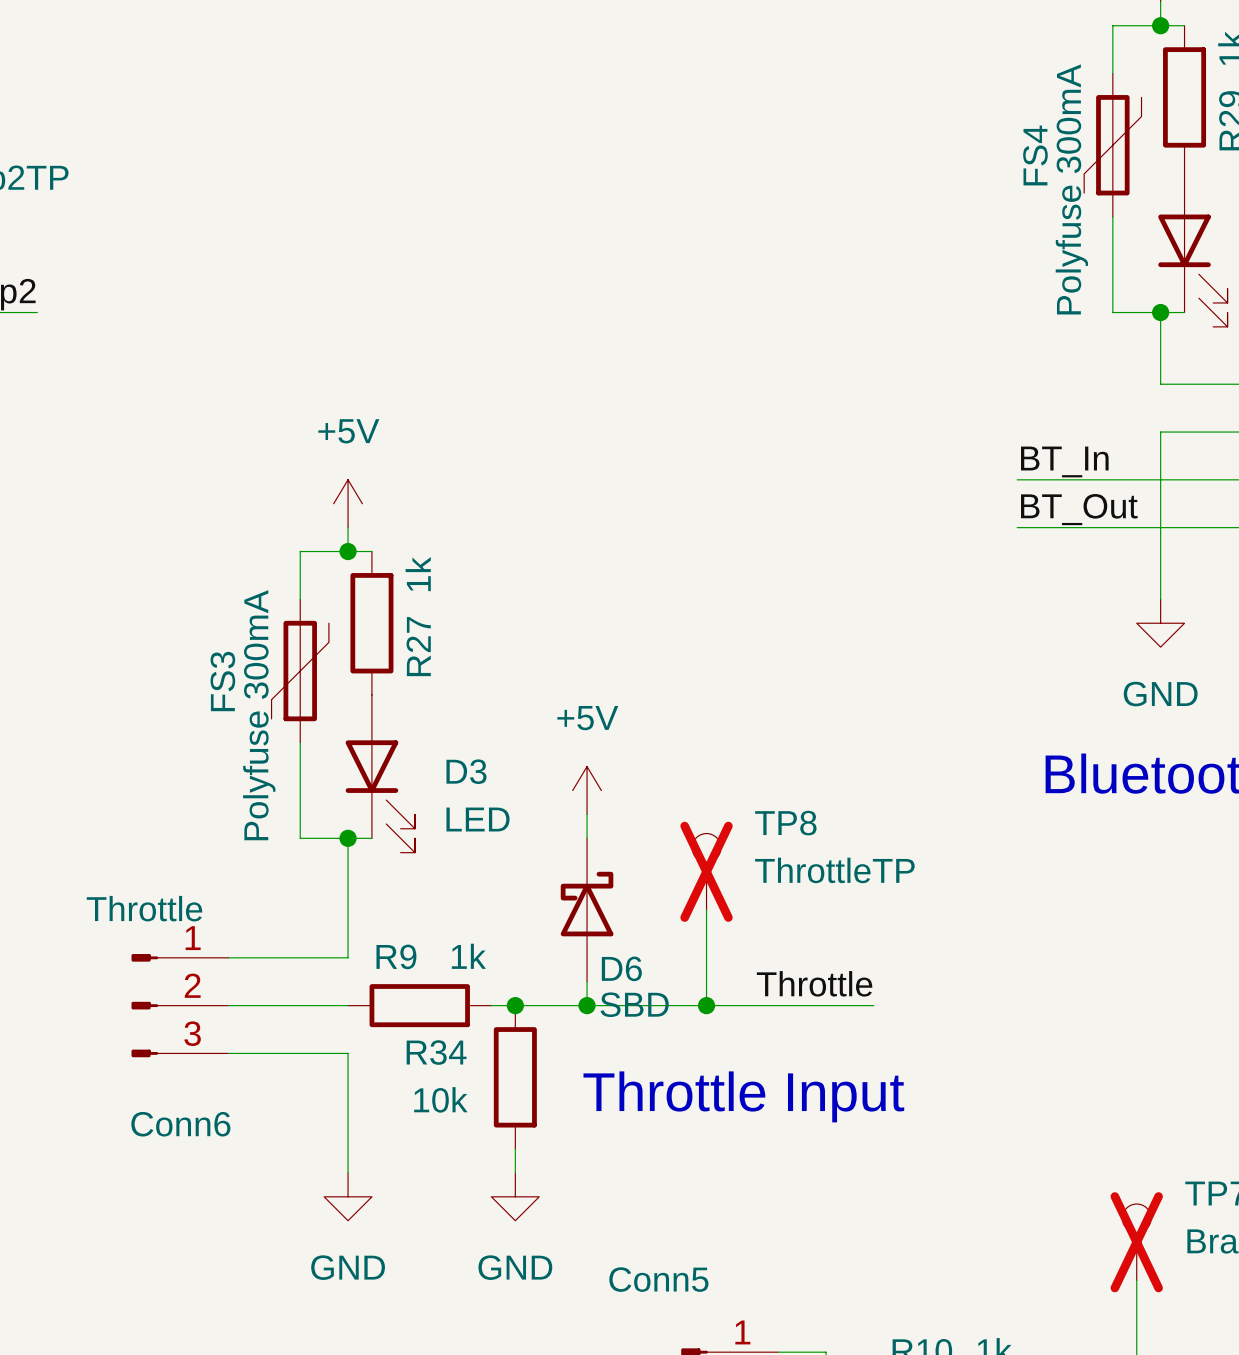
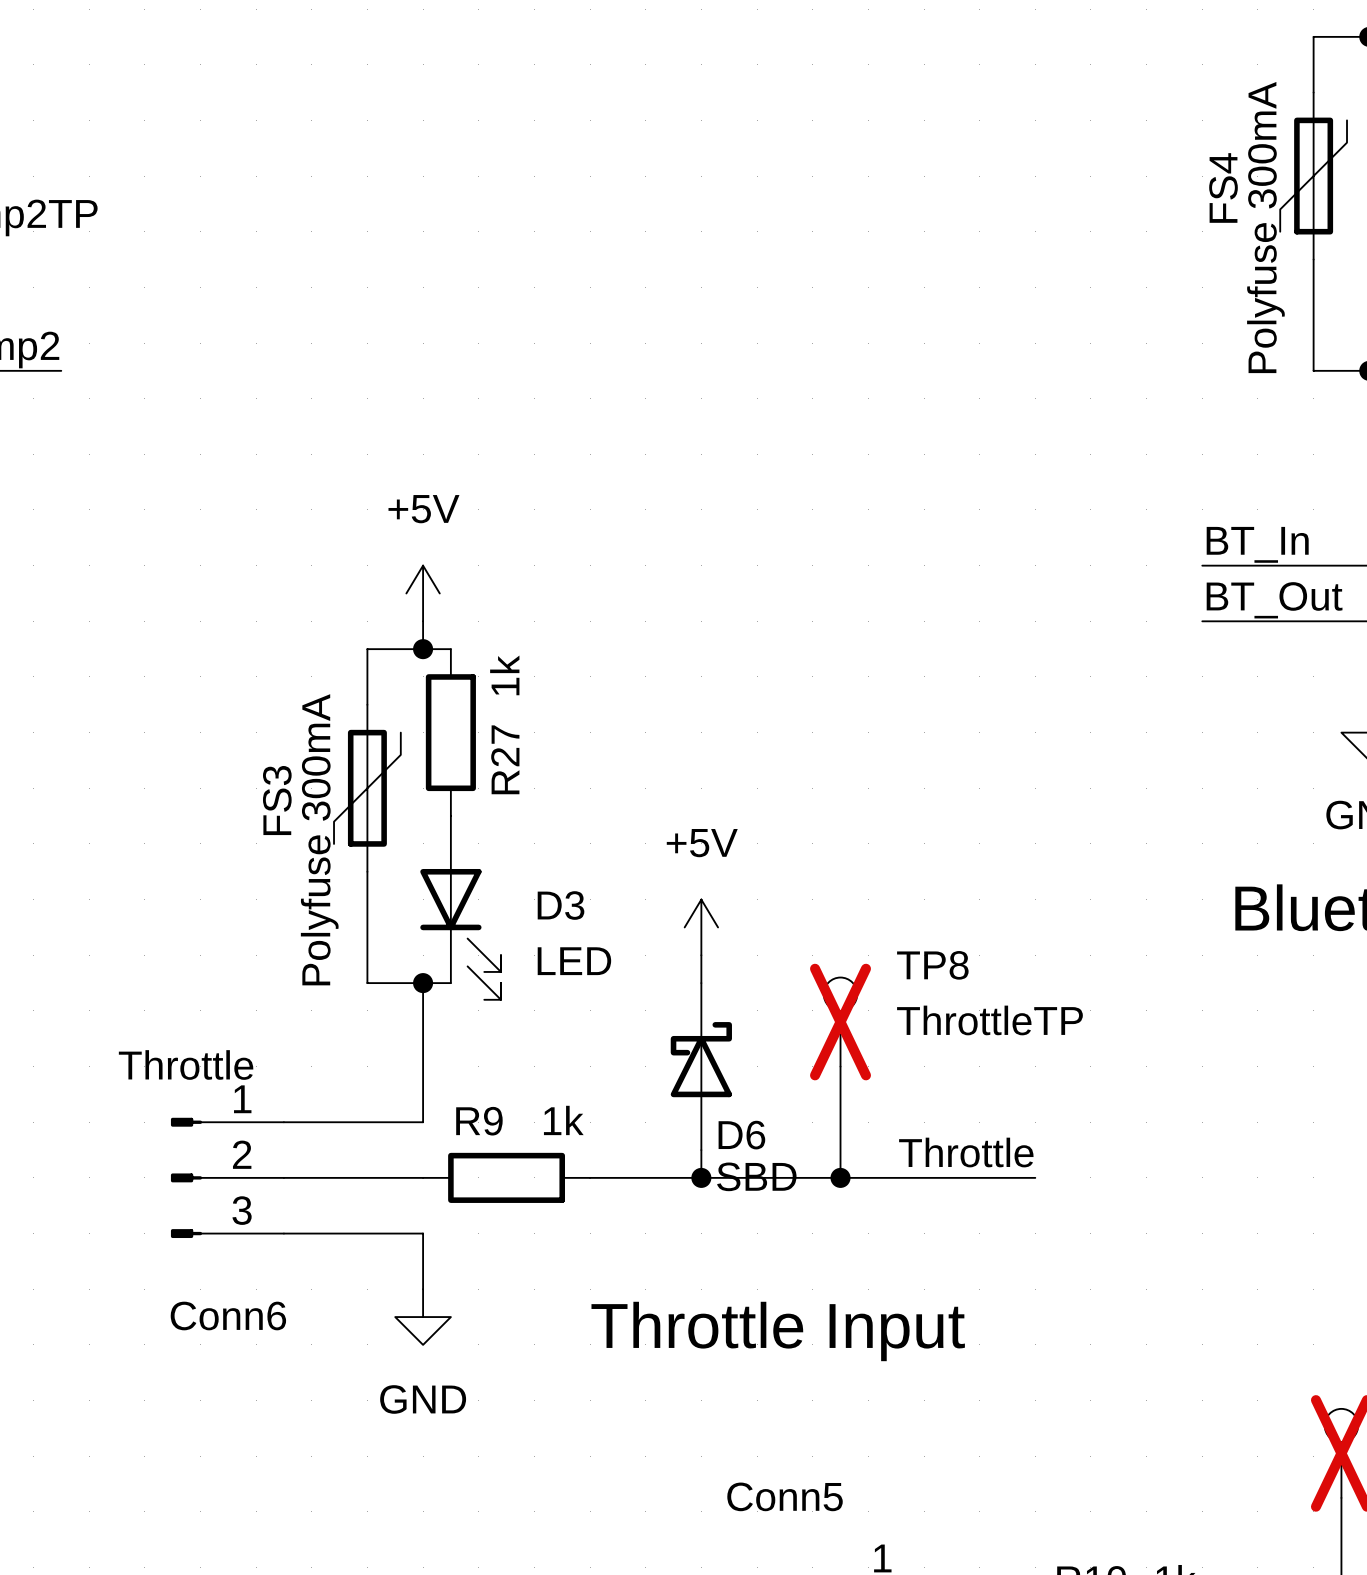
junction: (515, 1005) -> none
R34: 10k (515, 1077) -> none
text position: Throttle Input (743, 1096) -> Throttle Input (778, 1331)
wire: (348, 1101) (348, 1172) -> none
wire: (515, 1149) (515, 1172) -> none
power symbol position: GND (348, 1196) -> GND (423, 1317)
power symbol: GND (515, 1196) -> none

